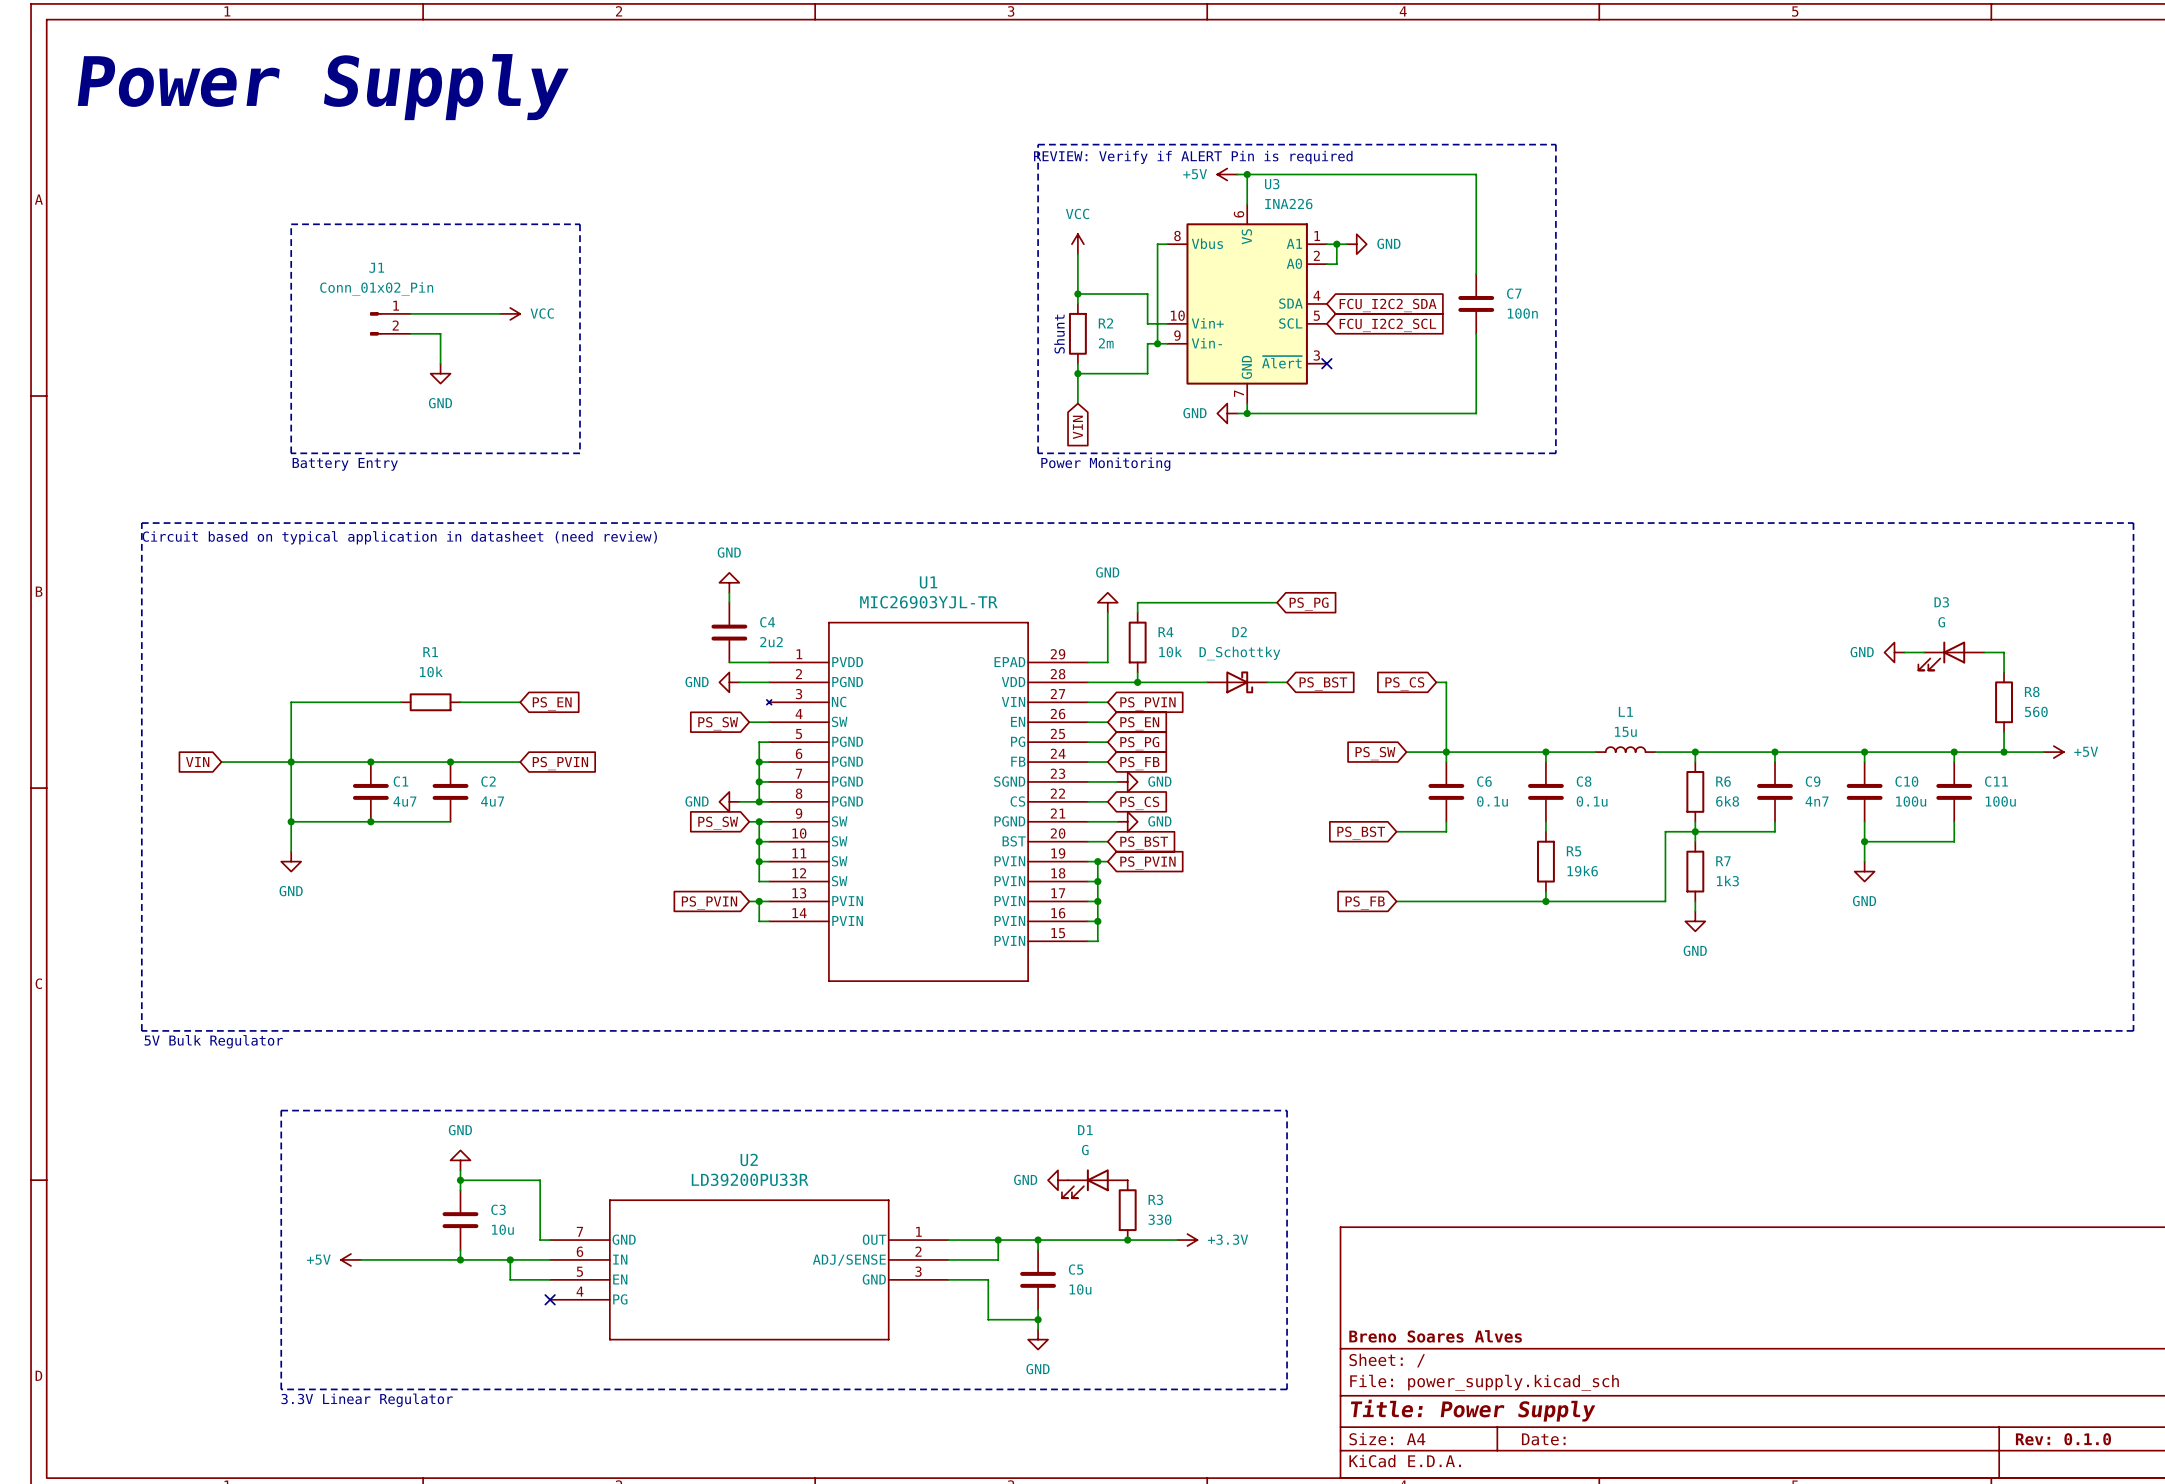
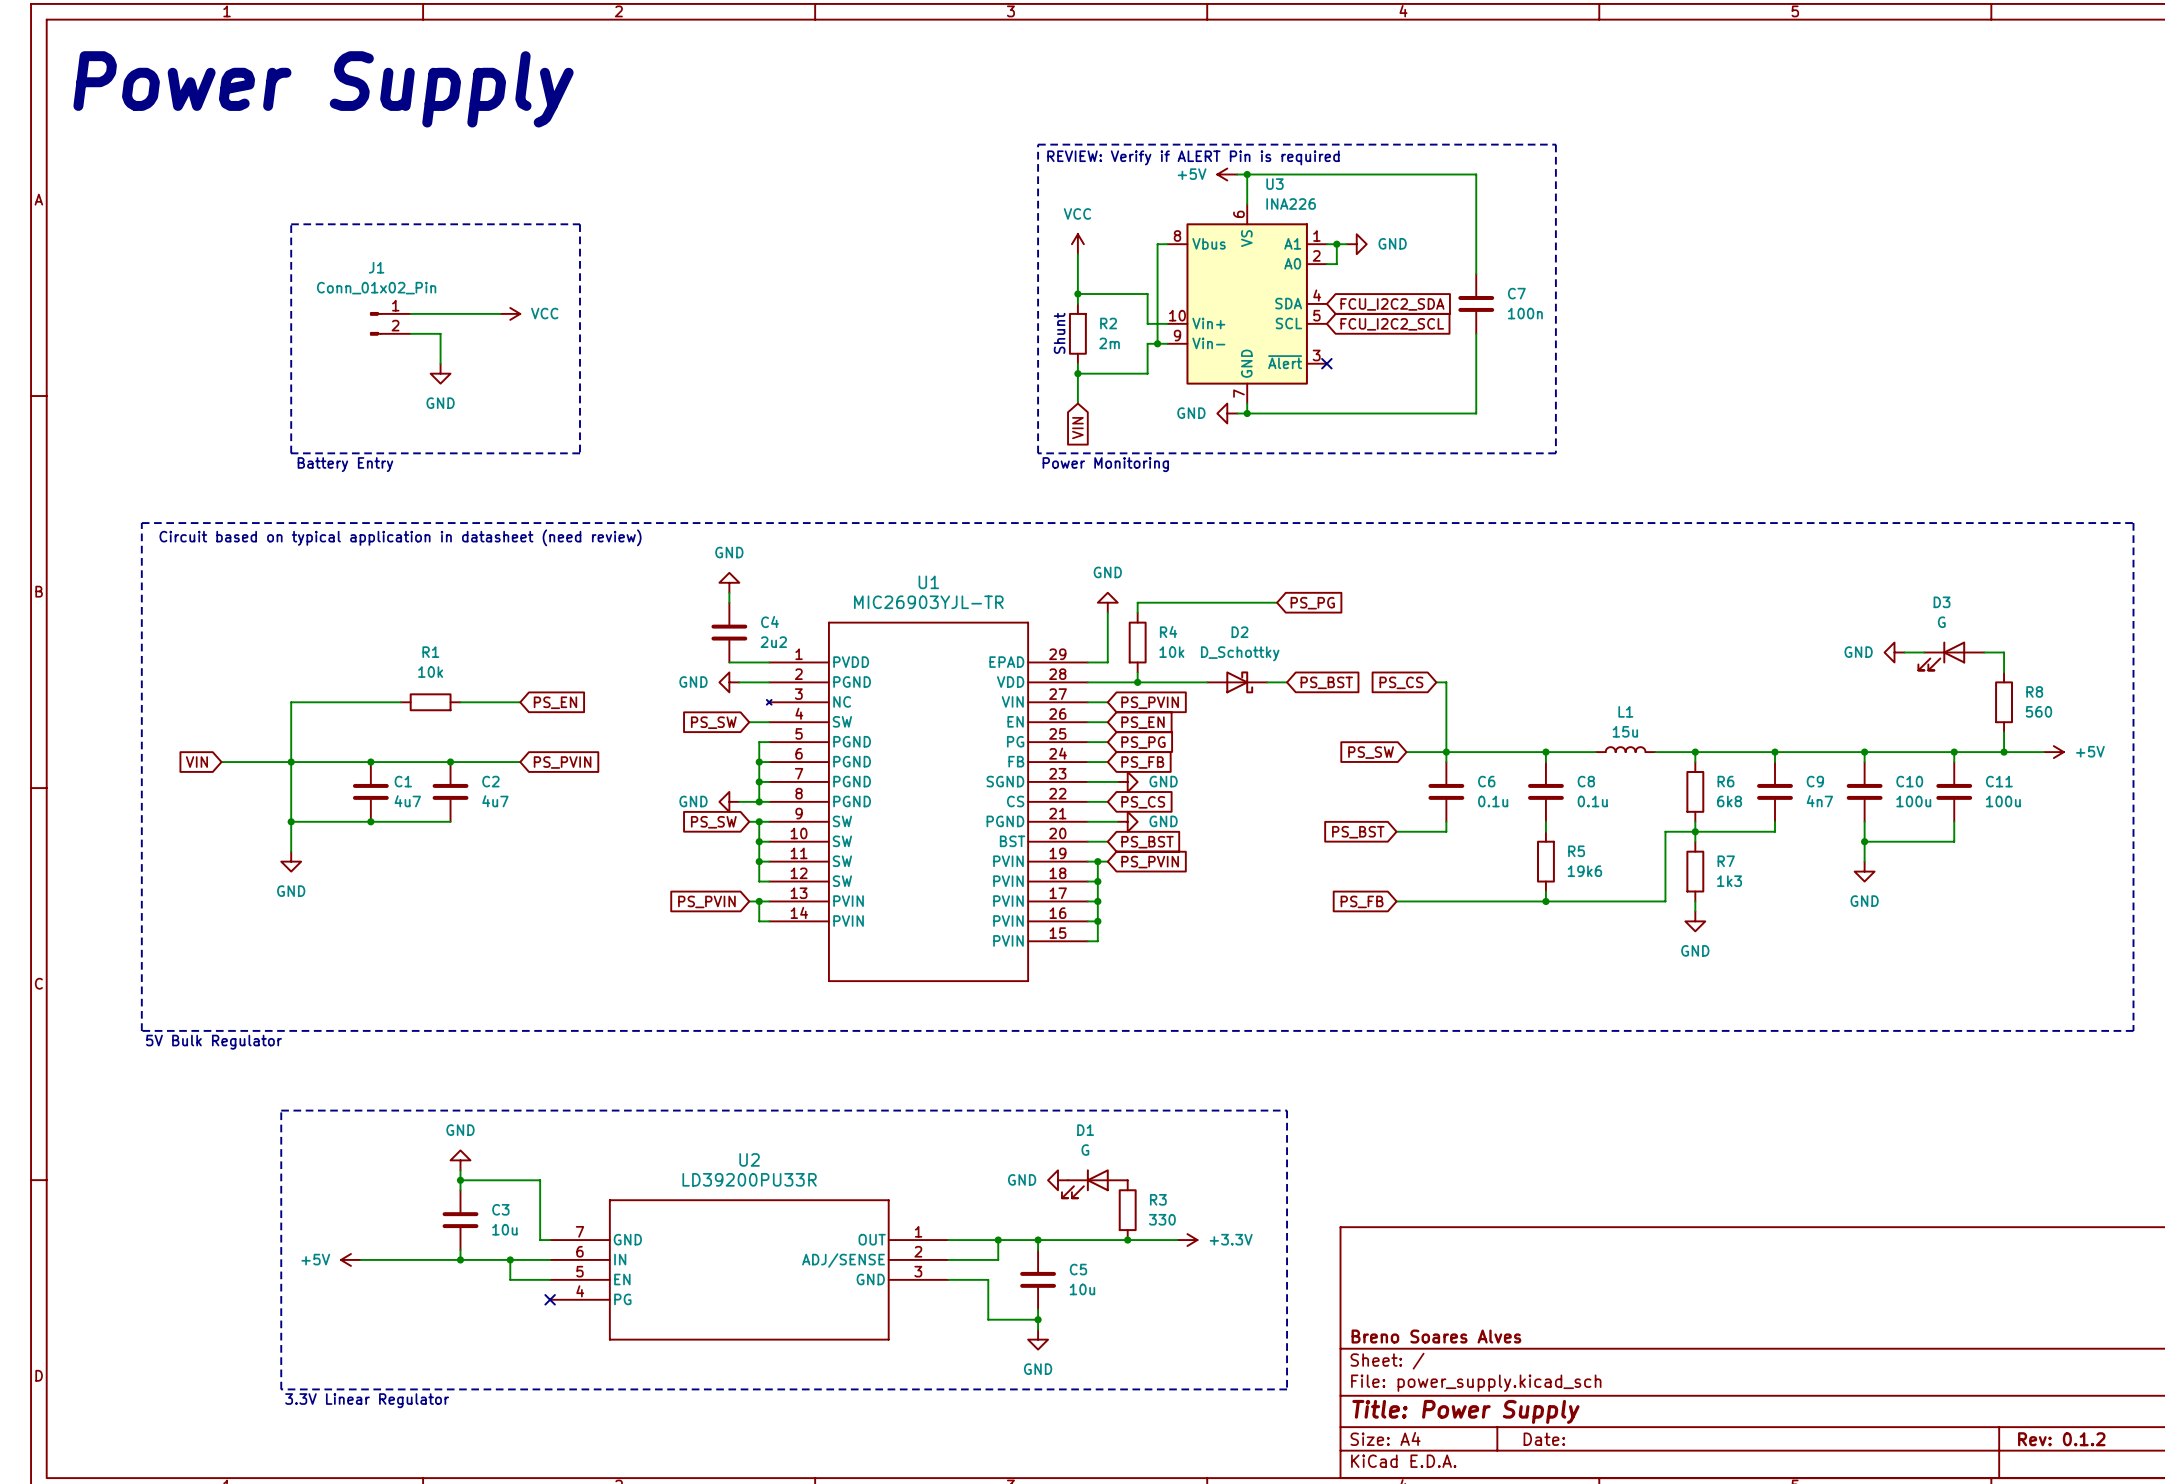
title block: Rev: 0.1.0 (2063, 1439) -> Rev: 0.1.2 (2061, 1439)

